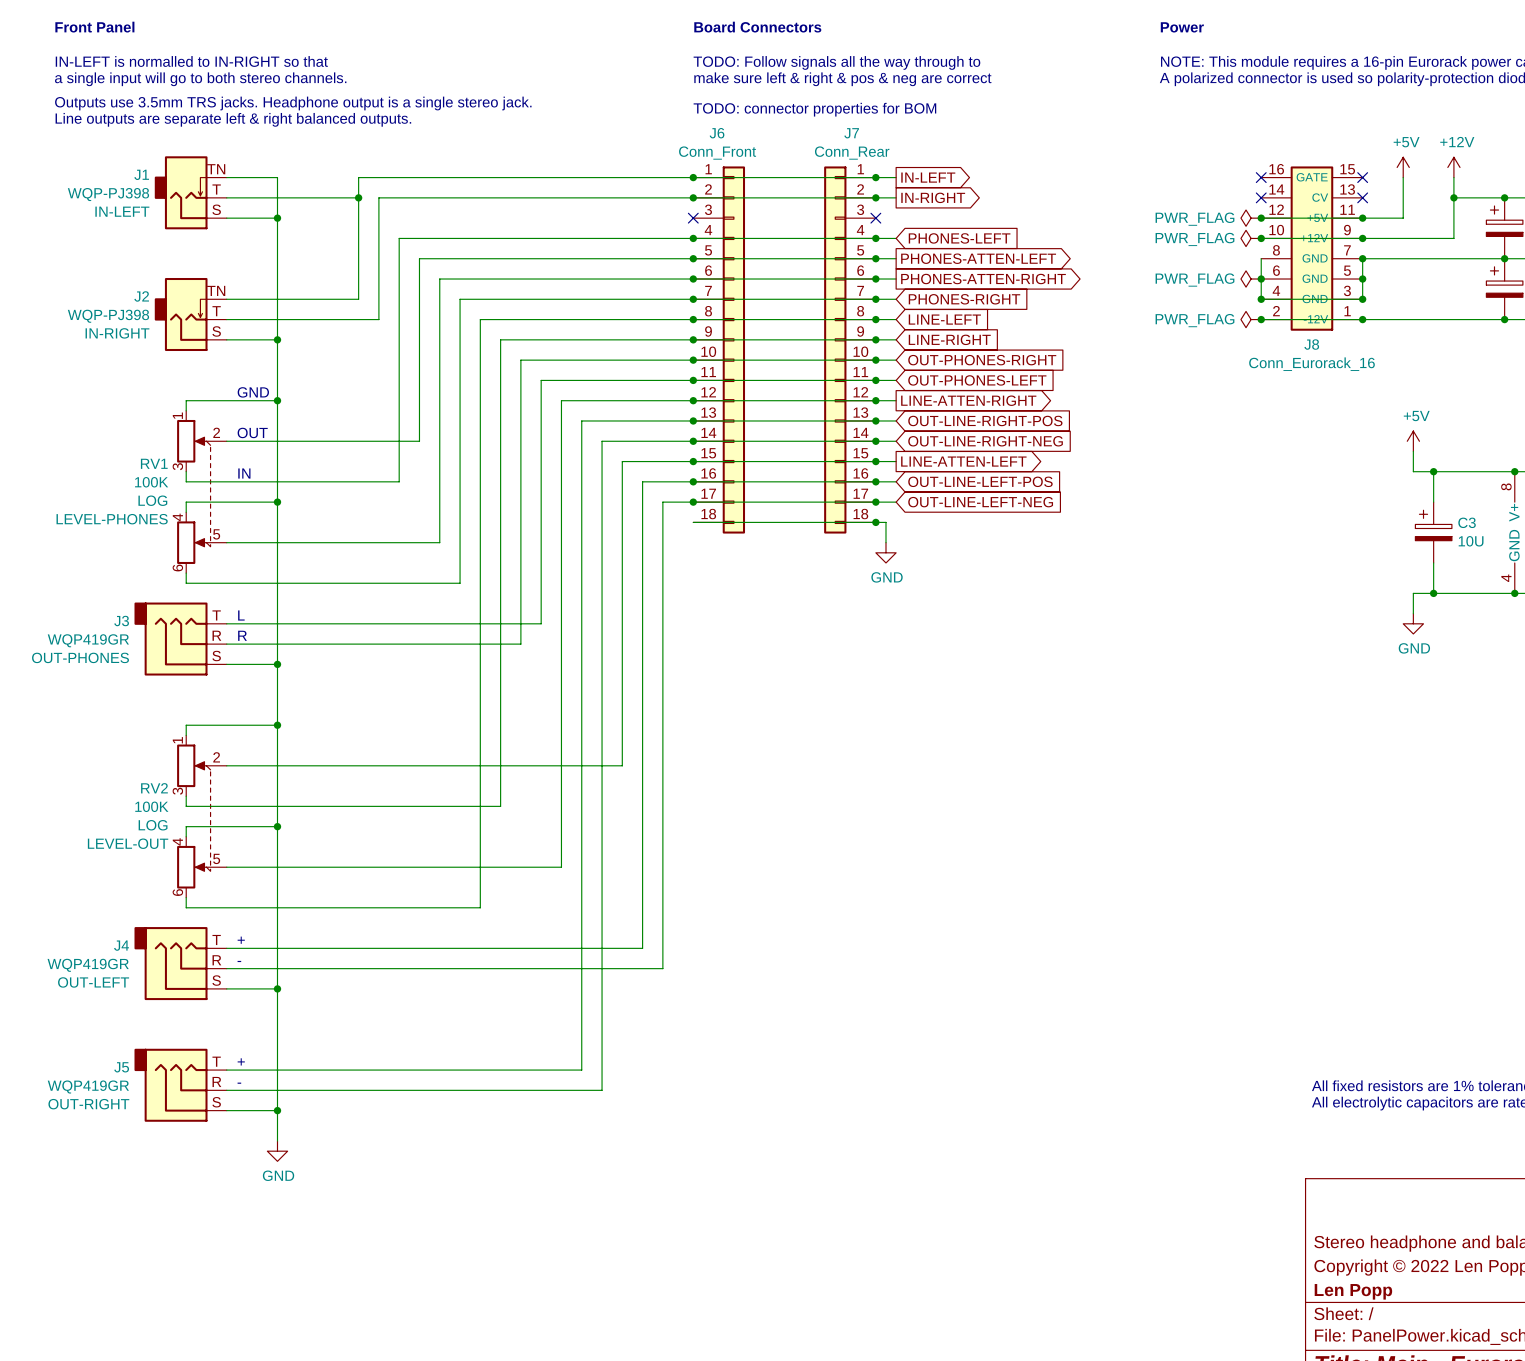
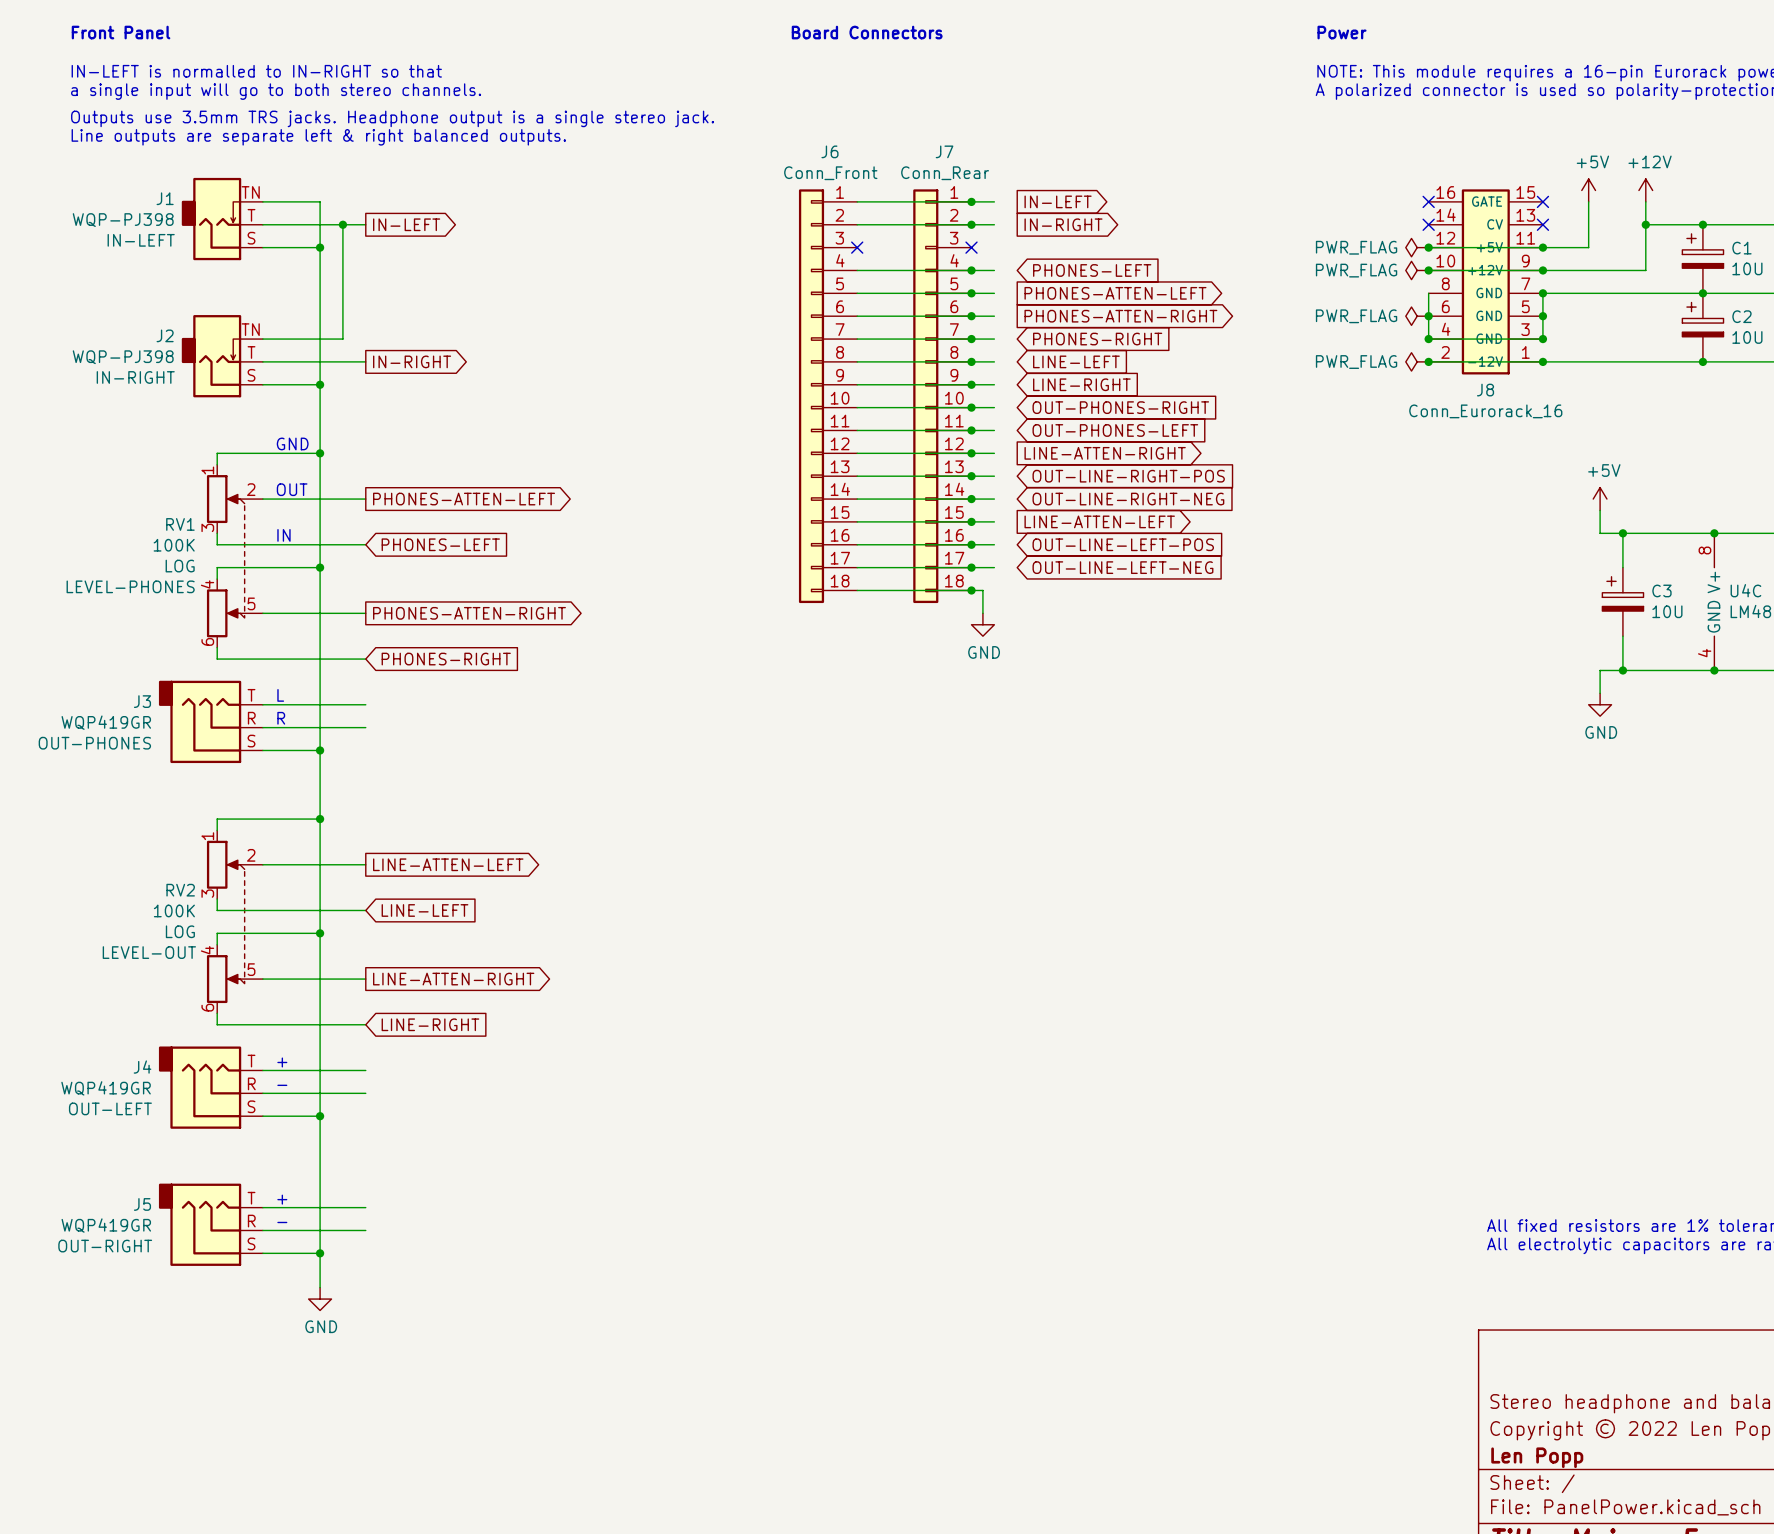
text: TODO: Follow signals all the way through to (836, 62) -> none
text: make sure left & right & pos & neg are correct (842, 79) -> none
text: TODO: connector properties for BOM (814, 109) -> none
junction: (693, 177) -> none
wire: (754, 177) (358, 177) (358, 299) (297, 299) -> (342, 224) (342, 339)
junction: none -> (971, 201)
wire: (875, 177) (896, 177) -> none
junction: (875, 177) -> none
junction: none -> (342, 224)
wire: (318, 197) (358, 197) -> none
global label: none -> IN-LEFT (406, 224)
junction: (358, 197) -> none
junction: (693, 197) -> none
wire: (754, 197) (378, 197) (378, 319) (318, 319) -> none
junction: none -> (971, 224)
wire: (875, 197) (896, 197) -> none
junction: (875, 197) -> none
no-connect mark: (693, 218) -> none
no-connect mark: none -> (857, 247)
no-connect mark position: (875, 218) -> (971, 247)
junction: (693, 238) -> none
wire: (754, 238) (399, 238) (399, 481) (318, 481) -> none
junction: none -> (971, 270)
wire: (875, 238) (896, 238) -> none
junction: (875, 238) -> none
junction: (693, 258) -> none
wire: (754, 258) (419, 258) (419, 441) (318, 441) -> none
junction: none -> (971, 293)
wire: (875, 258) (896, 258) -> none
junction: (875, 258) -> none
junction: (693, 279) -> none
wire: (754, 279) (439, 279) (439, 542) (318, 542) -> none
junction: none -> (971, 316)
wire: (875, 279) (896, 279) -> none
junction: (875, 279) -> none
junction: (693, 299) -> none
wire: (754, 299) (460, 299) (460, 583) (318, 583) -> none
junction: none -> (971, 339)
wire: (875, 299) (896, 299) -> none
junction: (875, 299) -> none
global label: none -> IN-RIGHT (412, 361)
junction: (693, 319) -> none
wire: (754, 319) (480, 319) (480, 907) (318, 907) -> none
junction: none -> (971, 361)
wire: (875, 319) (896, 319) -> none
junction: (875, 319) -> none
junction: (693, 339) -> none
wire: (754, 339) (500, 339) (500, 806) (318, 806) -> none
junction: none -> (971, 384)
wire: (875, 339) (896, 339) -> none
junction: (875, 339) -> none
J6 flip: as is (733, 349) -> left-right (811, 396)
J7 position: (849, 349) -> (942, 396)
junction: (693, 360) -> none
wire: (754, 360) (520, 360) (520, 644) (318, 644) -> none
junction: none -> (971, 407)
wire: (875, 360) (896, 360) -> none
junction: (875, 360) -> none
junction: (693, 380) -> none
wire: (754, 380) (541, 380) (541, 623) (318, 623) -> none
junction: none -> (971, 430)
wire: (875, 380) (896, 380) -> none
junction: (875, 380) -> none
junction: (693, 400) -> none
wire: (754, 400) (561, 400) (561, 867) (318, 867) -> none
junction: none -> (971, 453)
wire: (875, 400) (896, 400) -> none
junction: (875, 400) -> none
junction: (693, 420) -> none
wire: (754, 420) (581, 420) (581, 1070) (318, 1070) -> none
junction: none -> (971, 476)
wire: (875, 420) (896, 420) -> none
junction: (875, 420) -> none
global label: none -> PHONES-ATTEN-LEFT (464, 499)
junction: (693, 441) -> none
wire: (754, 441) (602, 441) (602, 1090) (318, 1090) -> none
junction: none -> (971, 499)
wire: (875, 441) (896, 441) -> none
junction: (875, 441) -> none
junction: (693, 461) -> none
wire: (754, 461) (622, 461) (622, 765) (318, 765) -> none
junction: none -> (971, 521)
wire: (875, 461) (896, 461) -> none
junction: (875, 461) -> none
global label: none -> PHONES-LEFT (440, 544)
junction: (693, 481) -> none
wire: (754, 481) (642, 481) (642, 948) (318, 948) -> none
junction: none -> (971, 544)
wire: (875, 481) (896, 481) -> none
junction: (875, 481) -> none
junction: (693, 502) -> none
wire: (754, 502) (662, 502) (662, 968) (318, 968) -> none
junction: none -> (971, 567)
wire: (875, 502) (896, 502) -> none
junction: (875, 502) -> none
junction: none -> (971, 590)
wire: (865, 522) (885, 522) (885, 542) -> (982, 590) (982, 613)
junction: (875, 522) -> none
global label: none -> PHONES-ATTEN-RIGHT (469, 613)
power symbol position: GND (885, 552) -> GND (982, 624)
global label: none -> PHONES-RIGHT (446, 659)
global label: none -> LINE-ATTEN-LEFT (448, 864)
global label: none -> LINE-LEFT (424, 910)
global label: none -> LINE-ATTEN-RIGHT (453, 979)
global label: none -> LINE-RIGHT (430, 1024)

